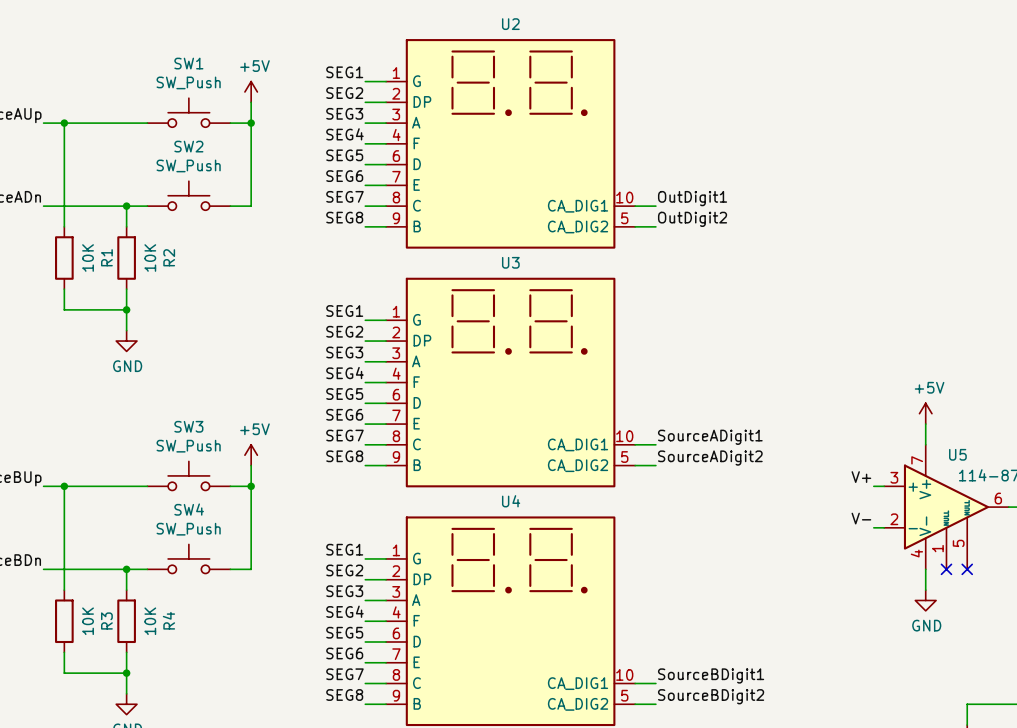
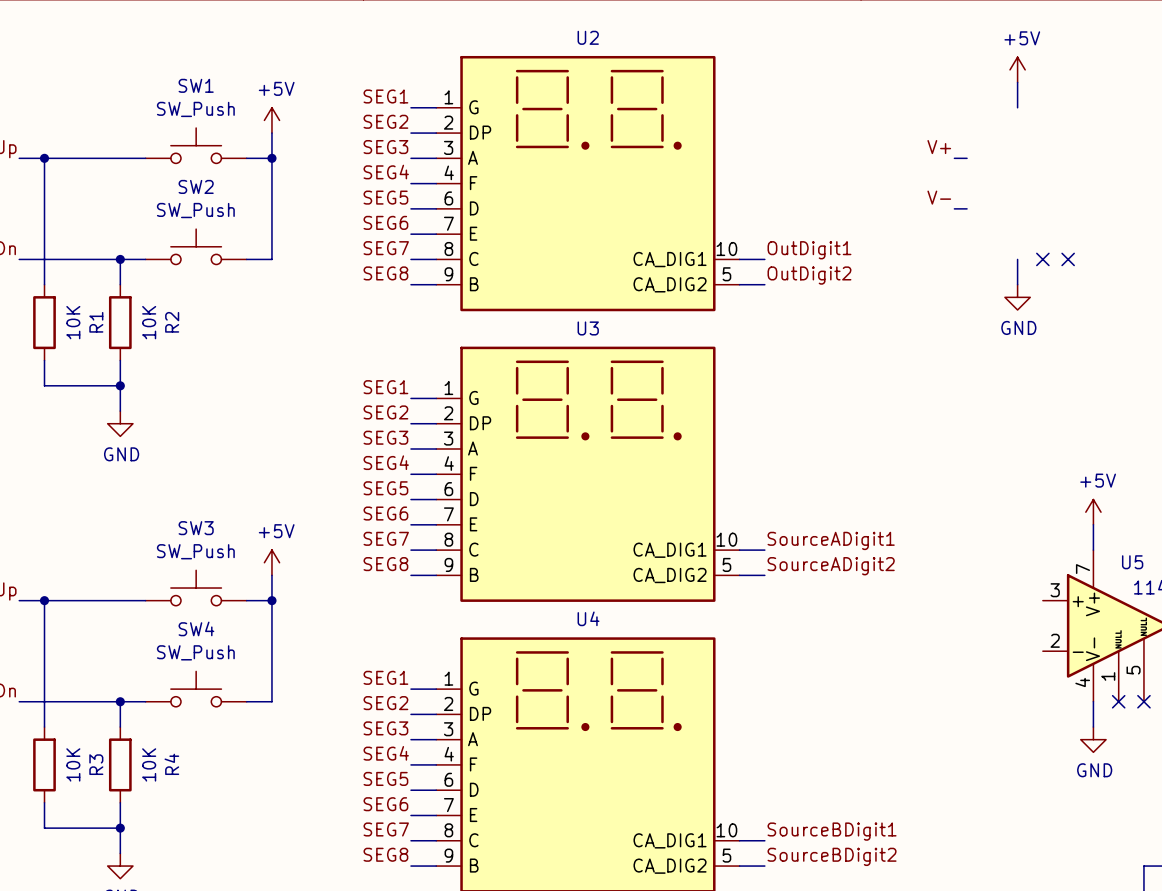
power symbol: none -> +5V (1017, 69)
wire: none -> (1017, 82) (1017, 107)
label: none -> V+ (939, 147)
wire: none -> (954, 158) (967, 158)
label: none -> V- (939, 197)
wire: none -> (954, 208) (967, 208)
wire: none -> (1017, 259) (1017, 284)
no-connect mark: none -> (1042, 259)
no-connect mark: none -> (1068, 259)
power symbol: none -> GND (1017, 297)
label: V+ (861, 477) -> none
wire: (873, 486) (884, 486) -> none
label: V- (861, 518) -> none
wire: (873, 527) (884, 527) -> none

